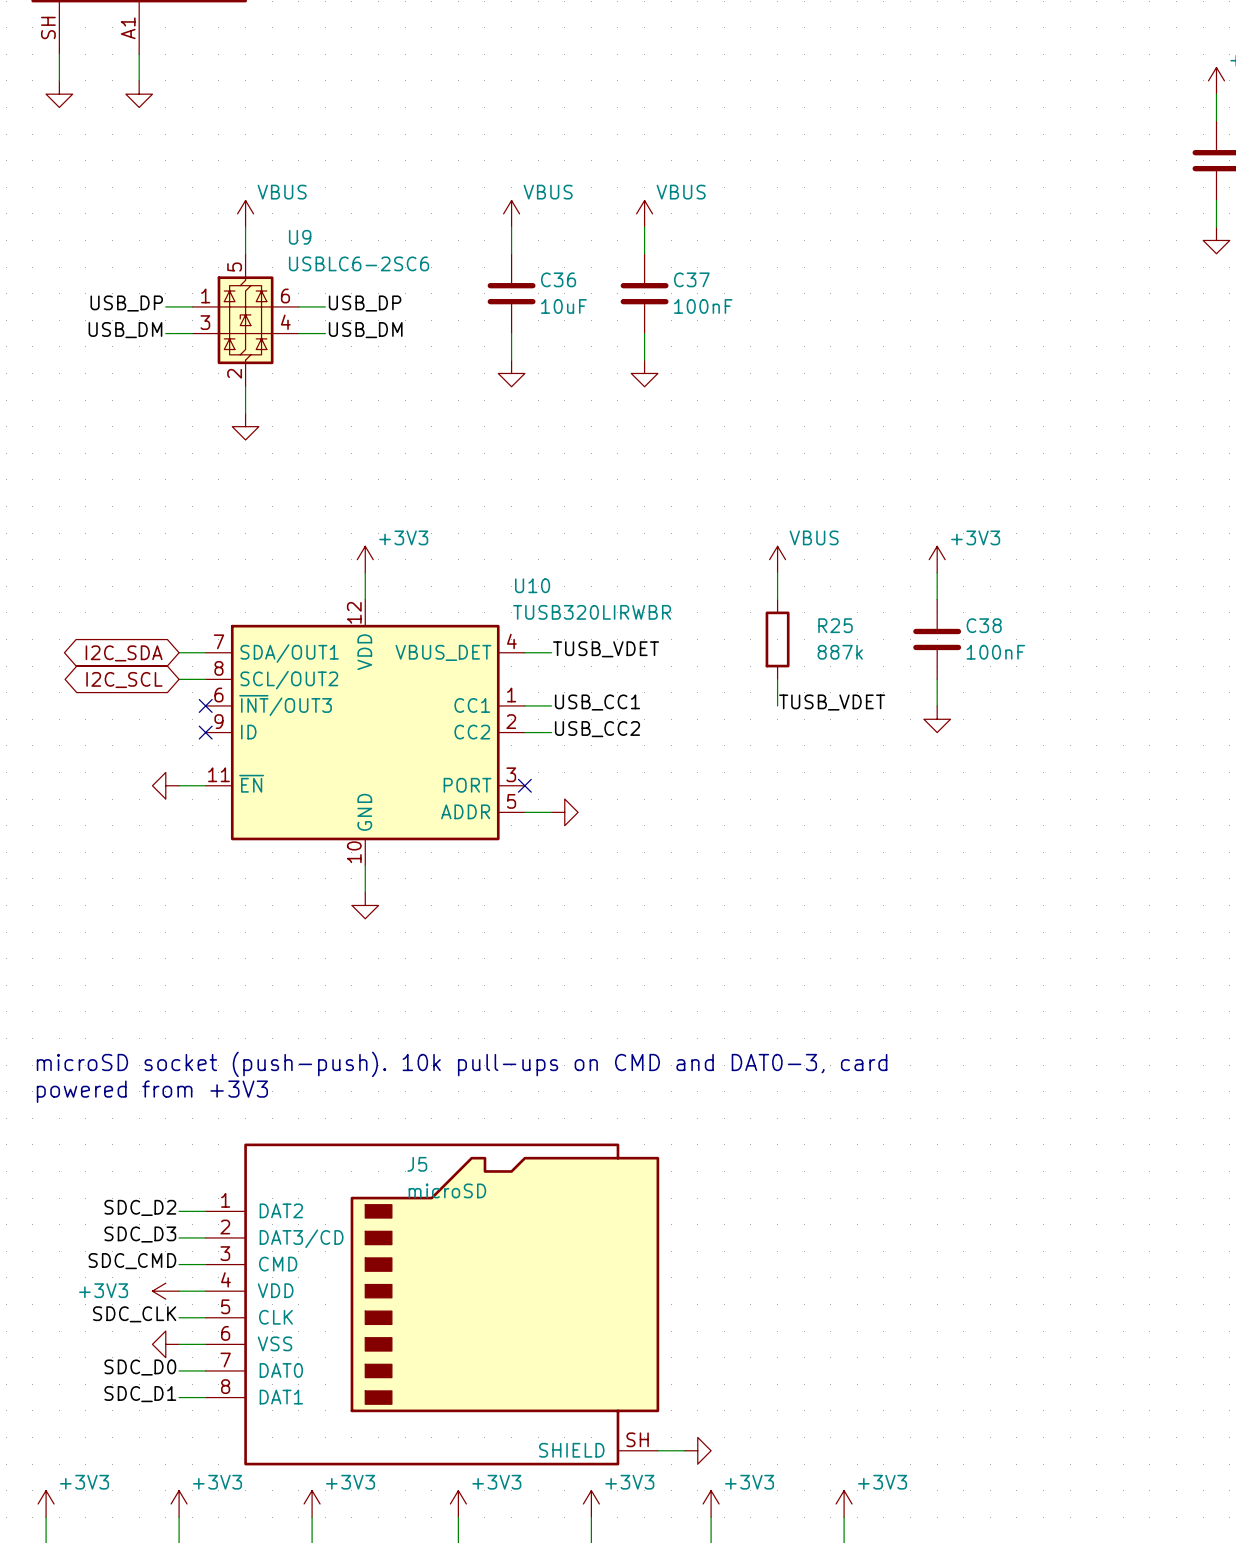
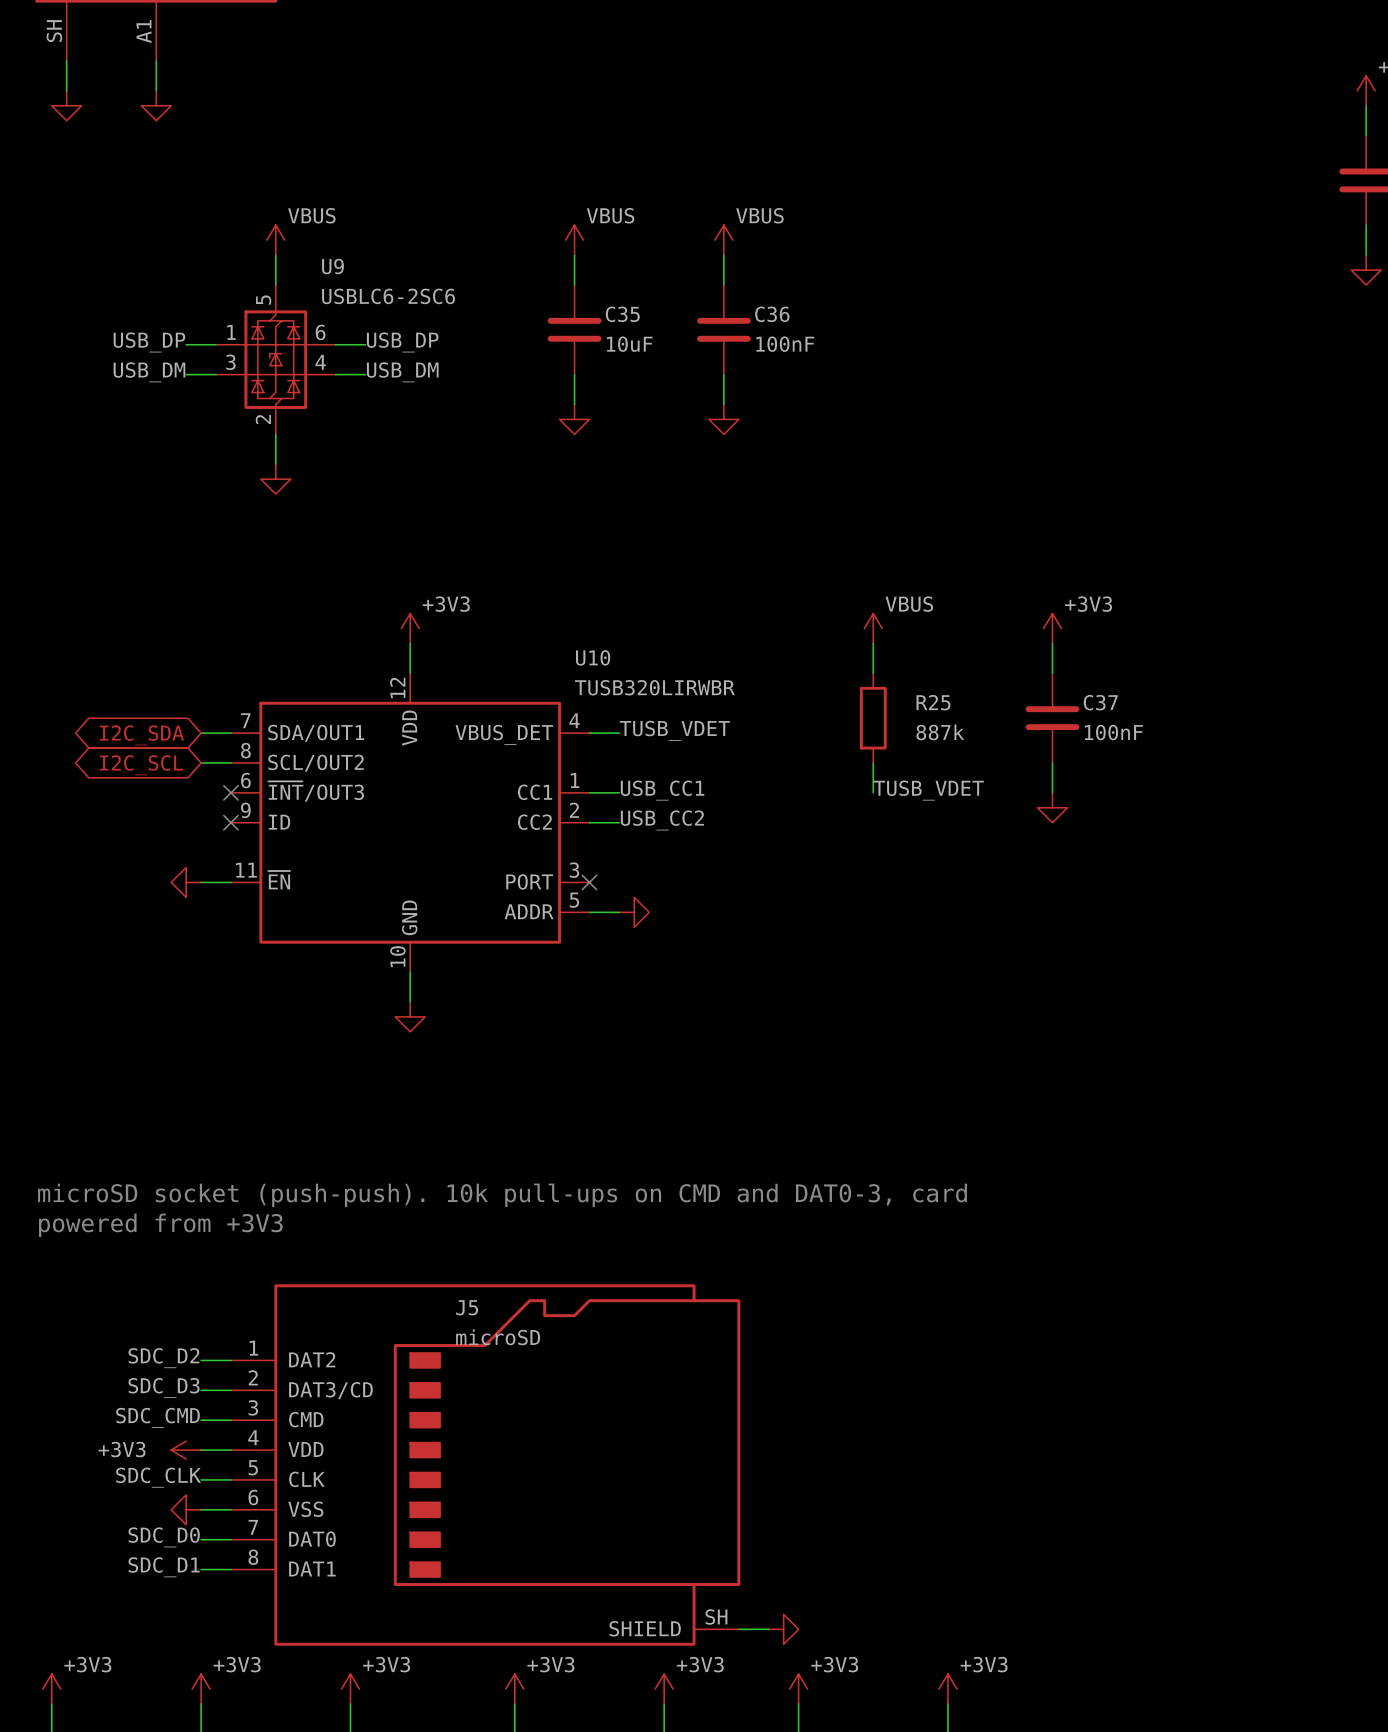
C36 name: C36 (558, 279) -> C35 (622, 314)
C37 name: C37 (691, 279) -> C36 (772, 314)
C38 name: C38 (984, 625) -> C37 (1100, 702)

